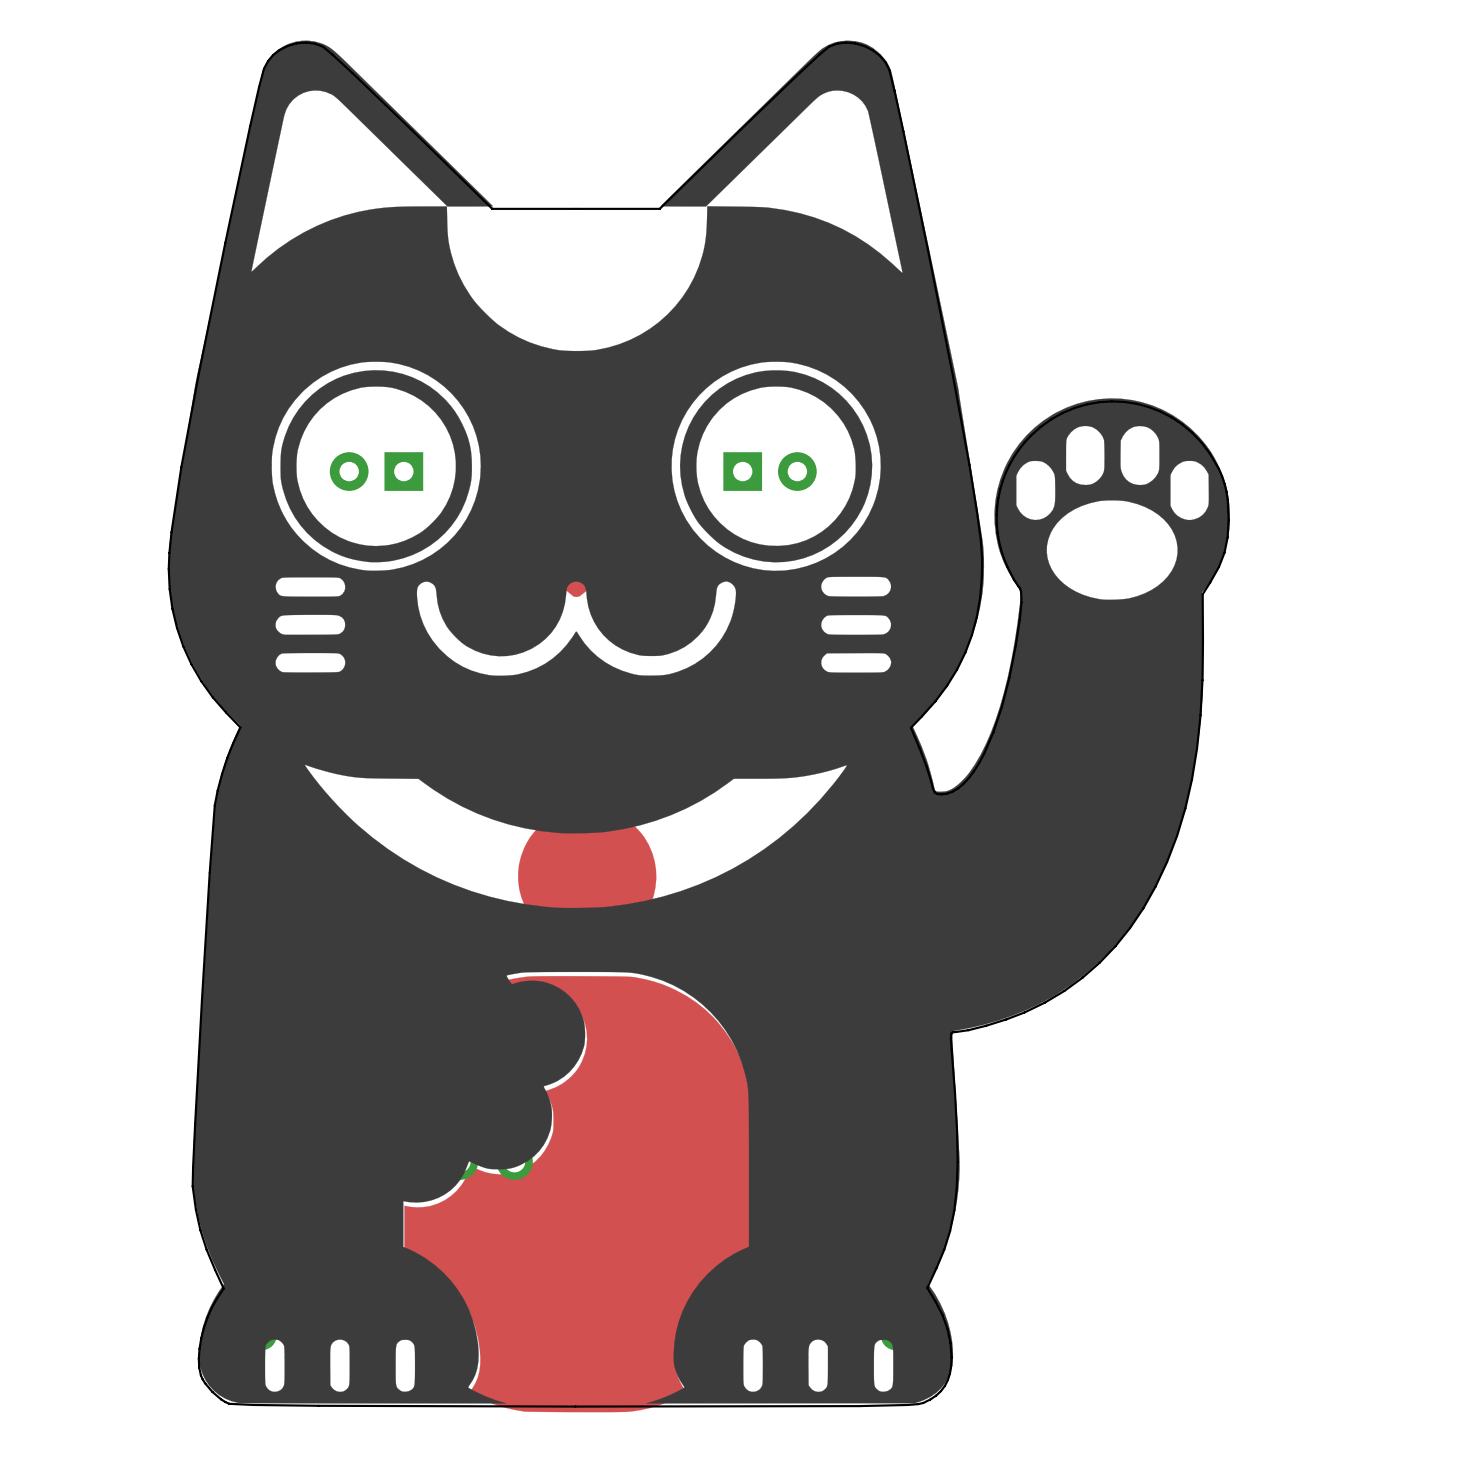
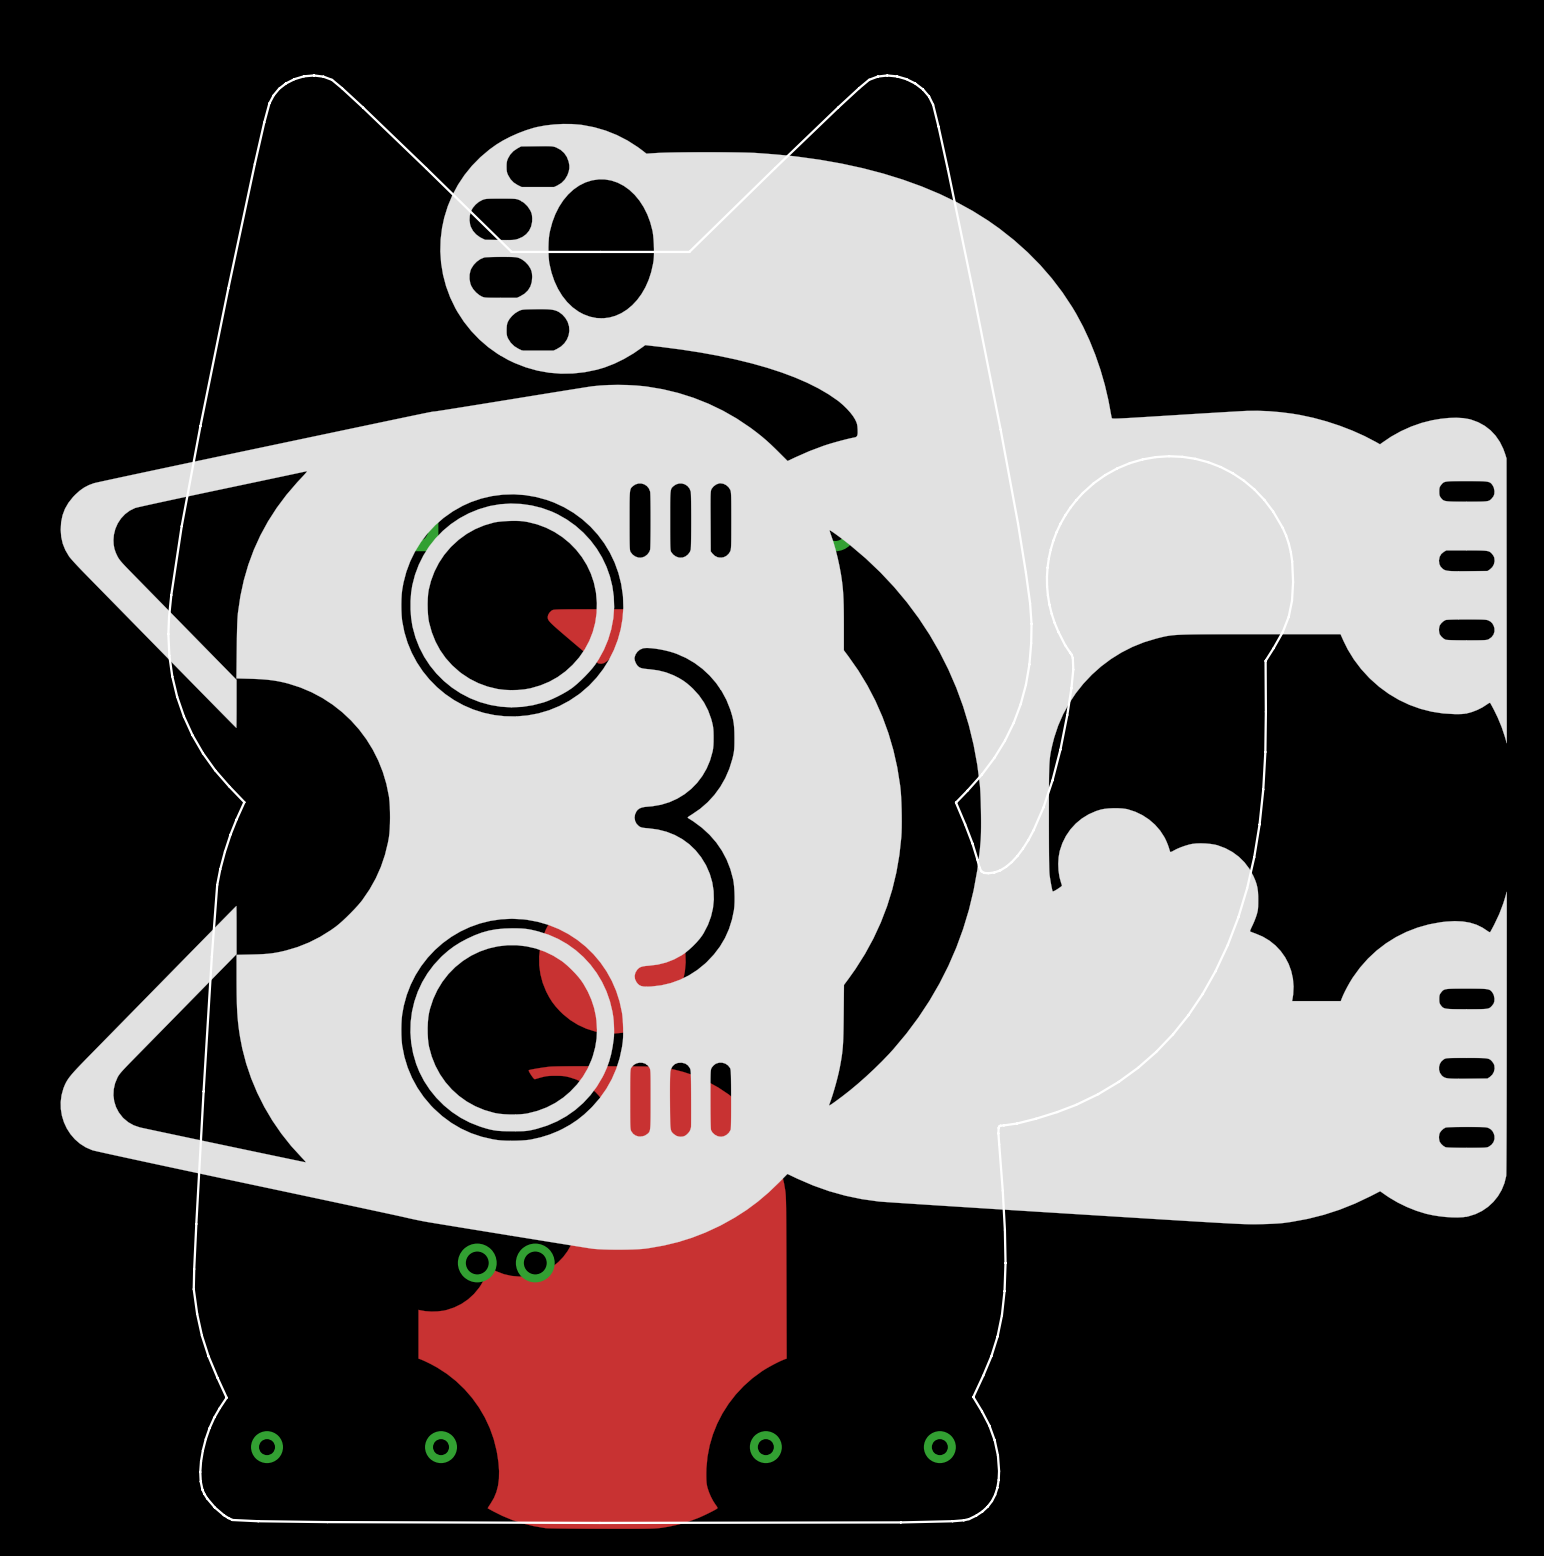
drawing: [168, 40, 1230, 1404] -> none
drawing: none -> [60, 123, 1507, 1250]

